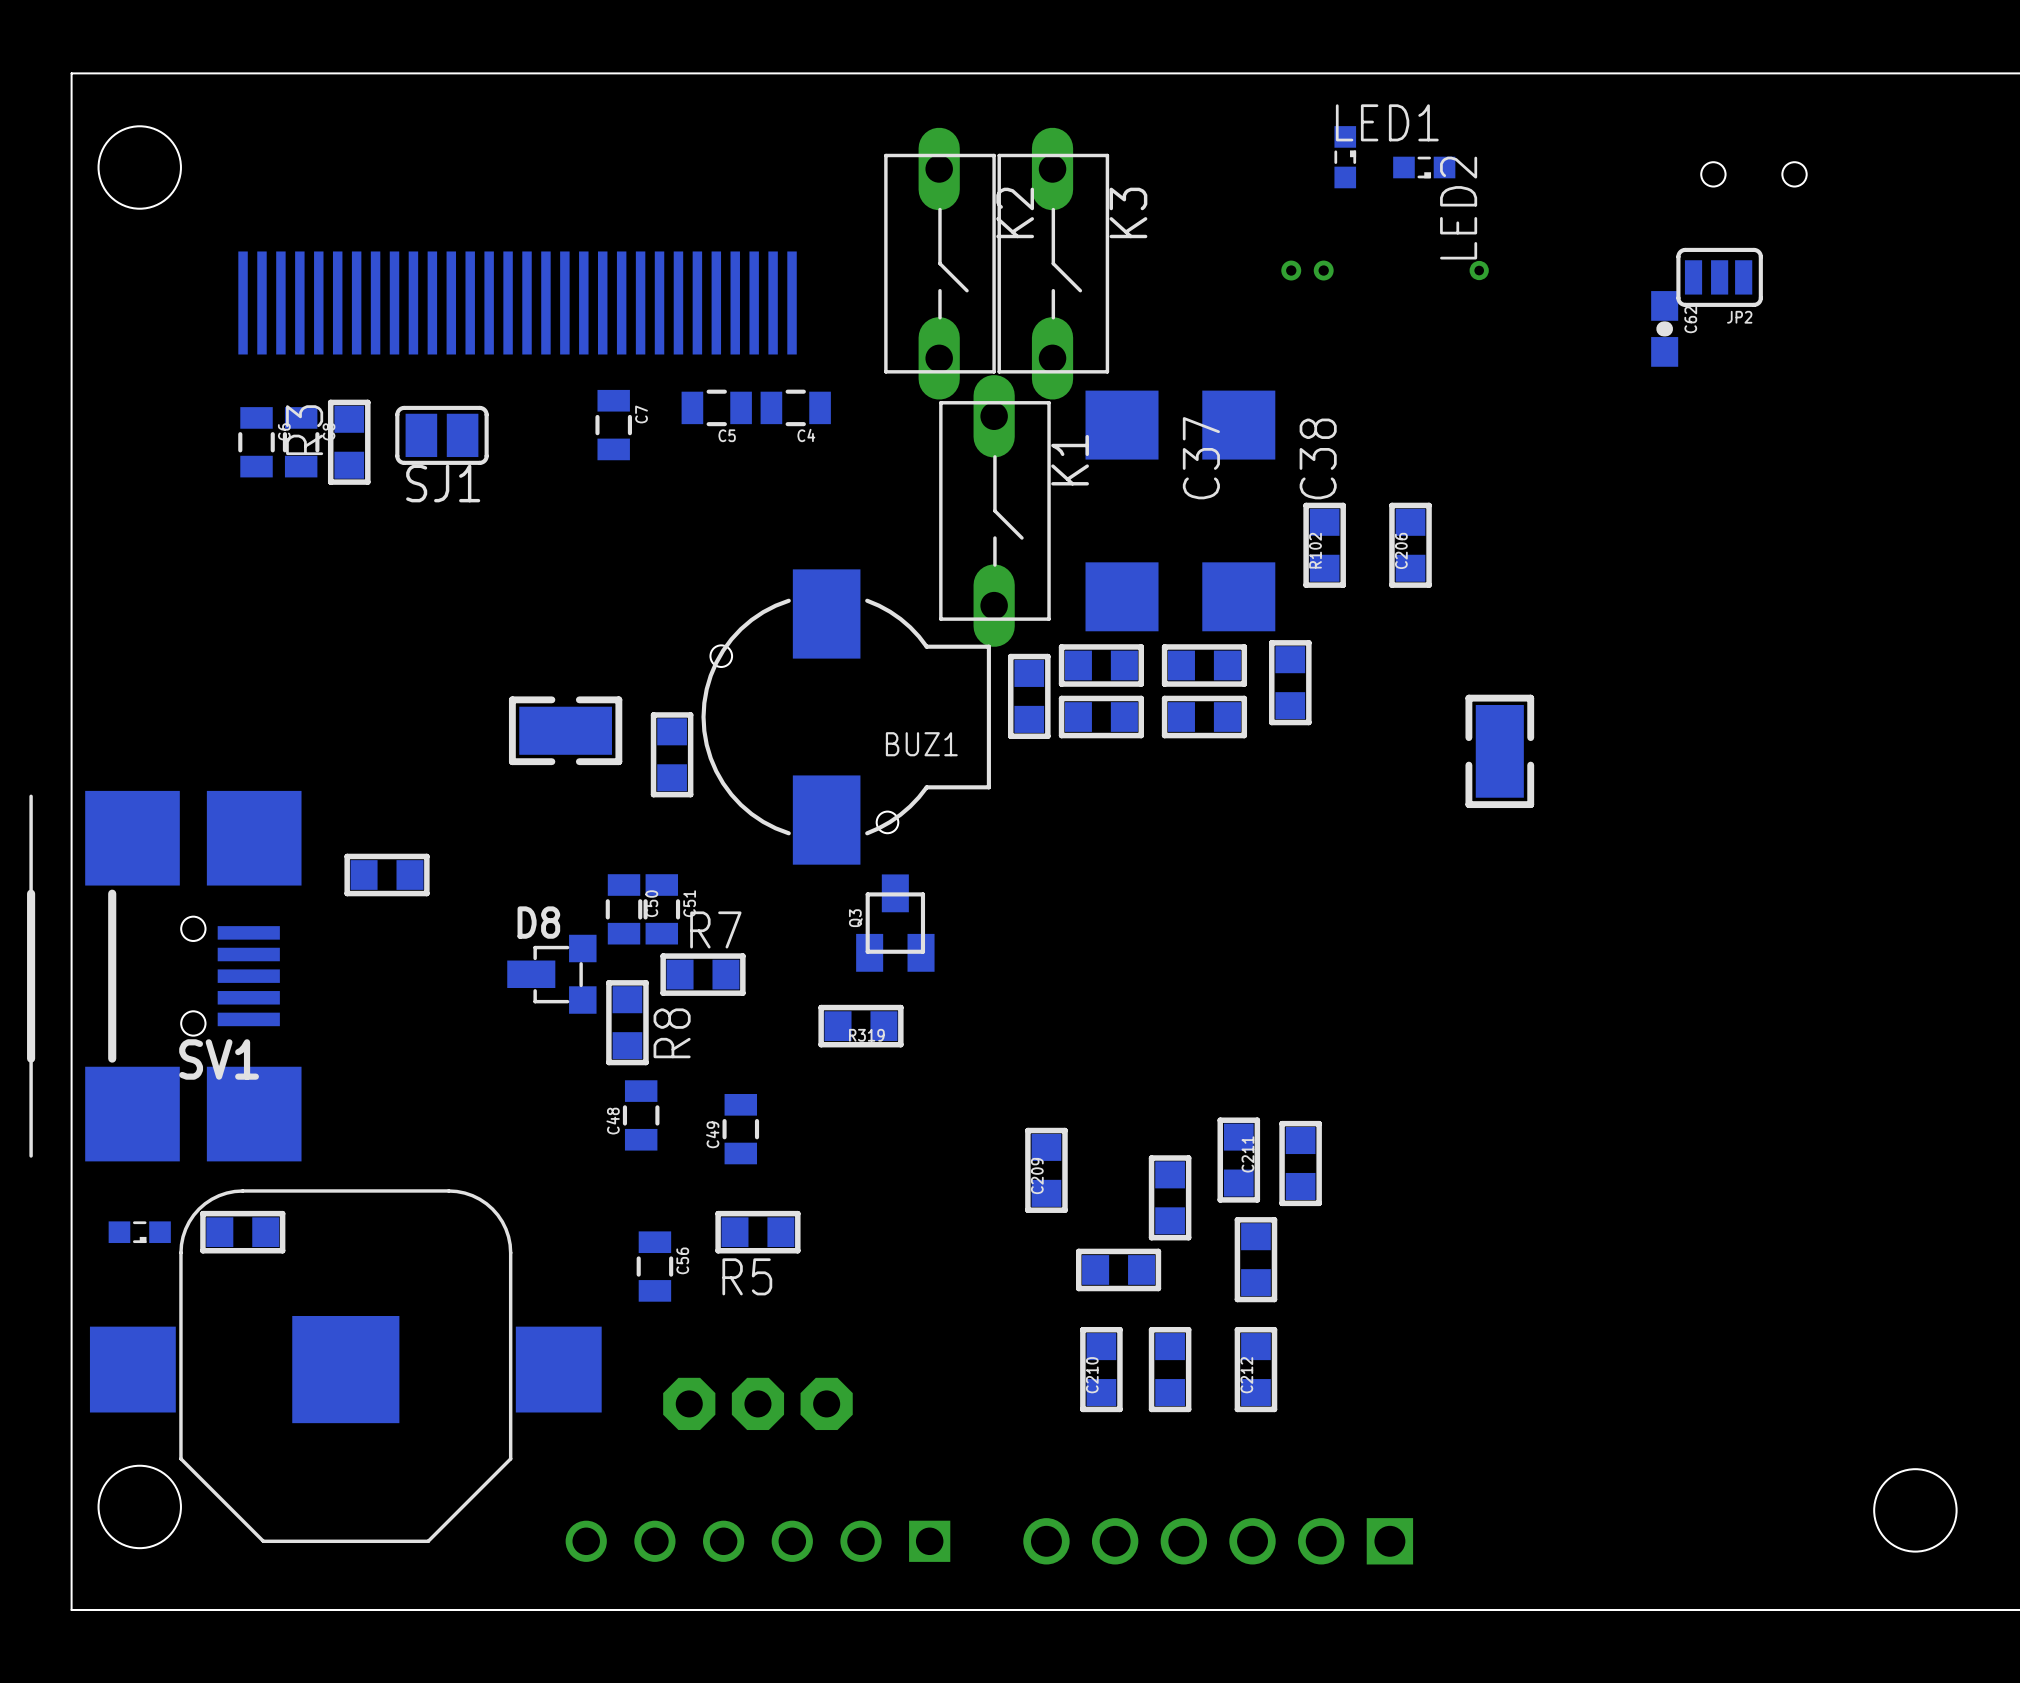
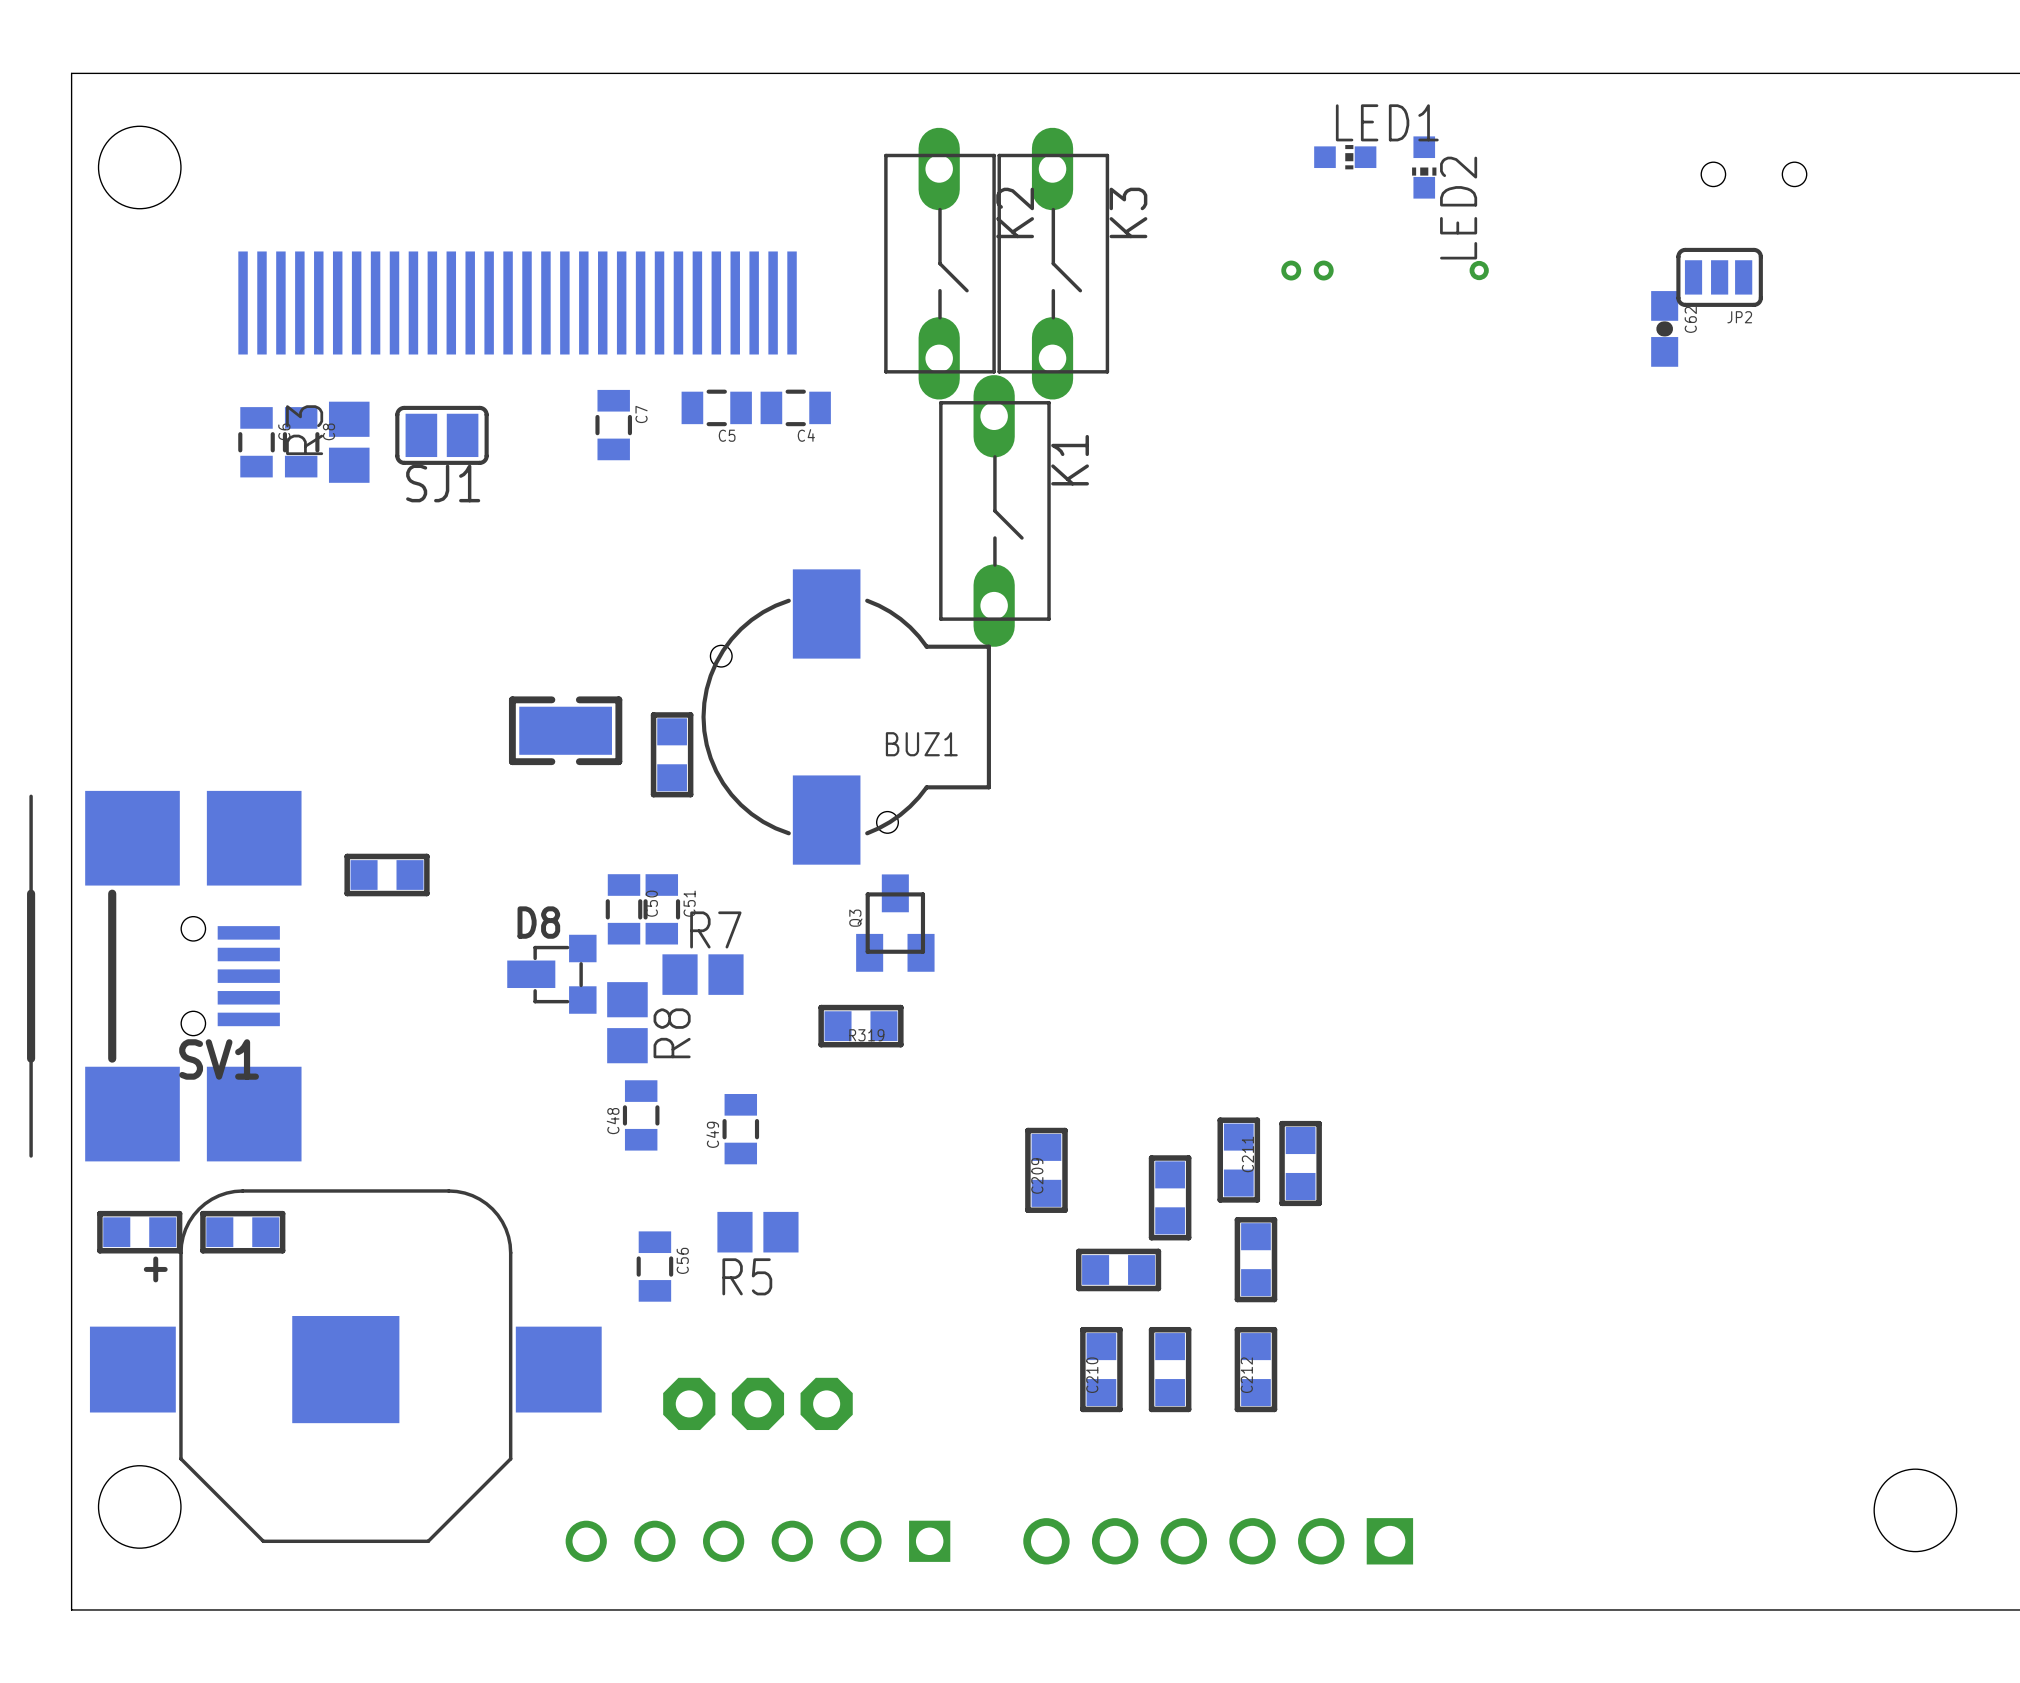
LED1 footprint: [1334, 126, 1357, 189] -> [1314, 145, 1377, 170]
LED2 footprint: [1393, 156, 1456, 179] -> [1412, 136, 1437, 199]
R3 footprint: [327, 399, 371, 485] -> [328, 401, 370, 483]
C37: (1122, 510) -> none
C38: (1238, 510) -> none
R102: (1324, 545) -> none
C206: (1410, 545) -> none
part: (1101, 665) -> none
part: (1204, 665) -> none
part: (1290, 682) -> none
part: (1029, 696) -> none
part: (1101, 717) -> none
part: (1204, 717) -> none
part: (1499, 751) -> none
R7 footprint: [660, 953, 746, 996] -> [662, 954, 744, 995]
R8 footprint: [606, 980, 649, 1066] -> [607, 982, 648, 1064]
R5 footprint: [715, 1210, 801, 1254] -> [717, 1211, 799, 1253]
part footprint: [108, 1221, 171, 1244] -> [97, 1210, 183, 1254]

